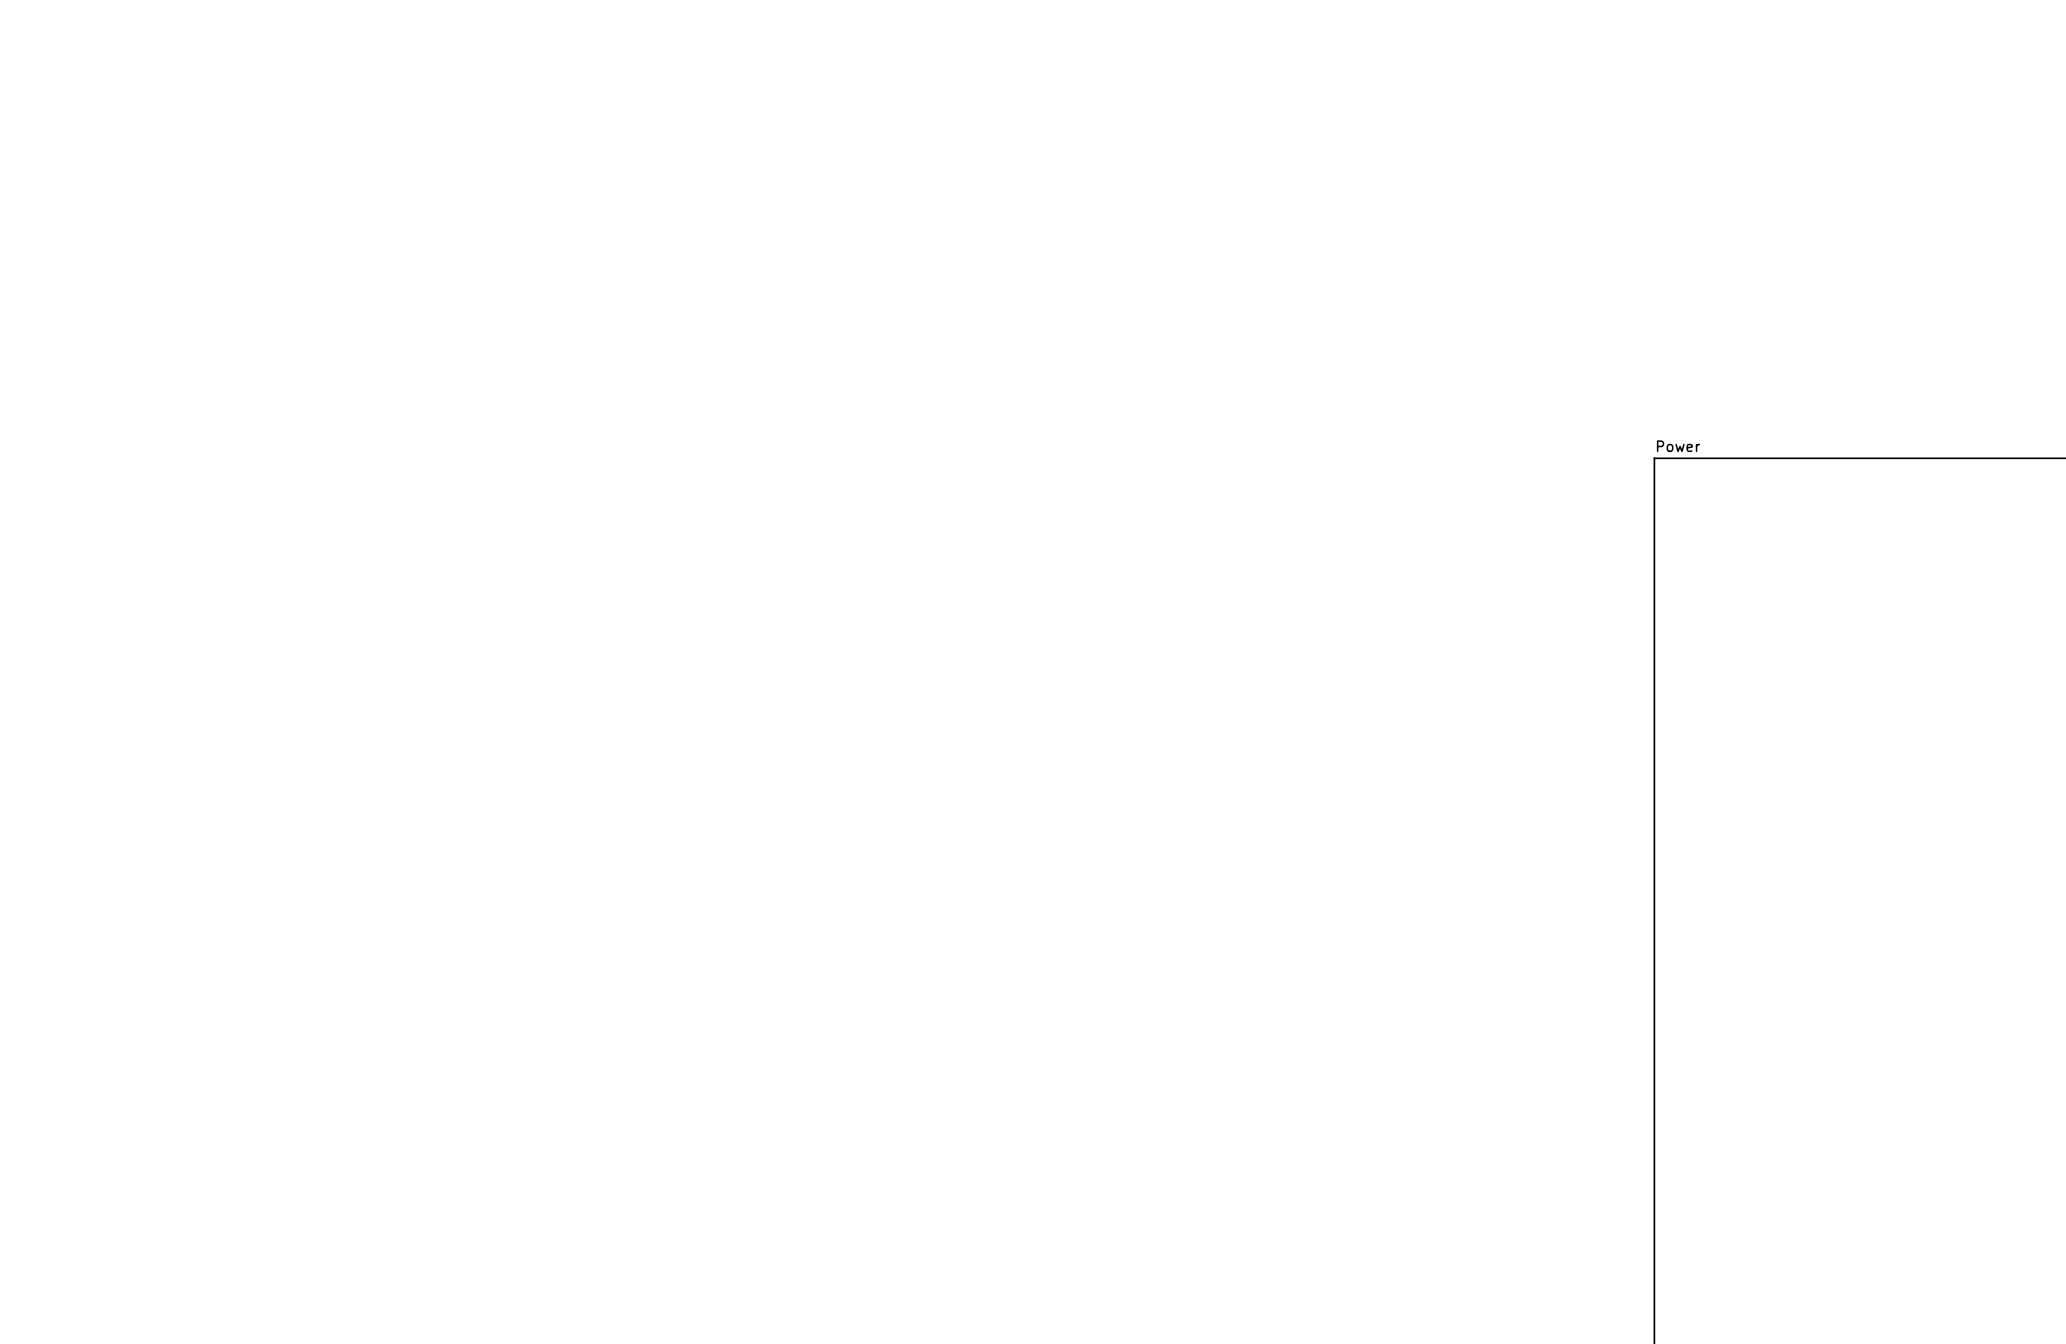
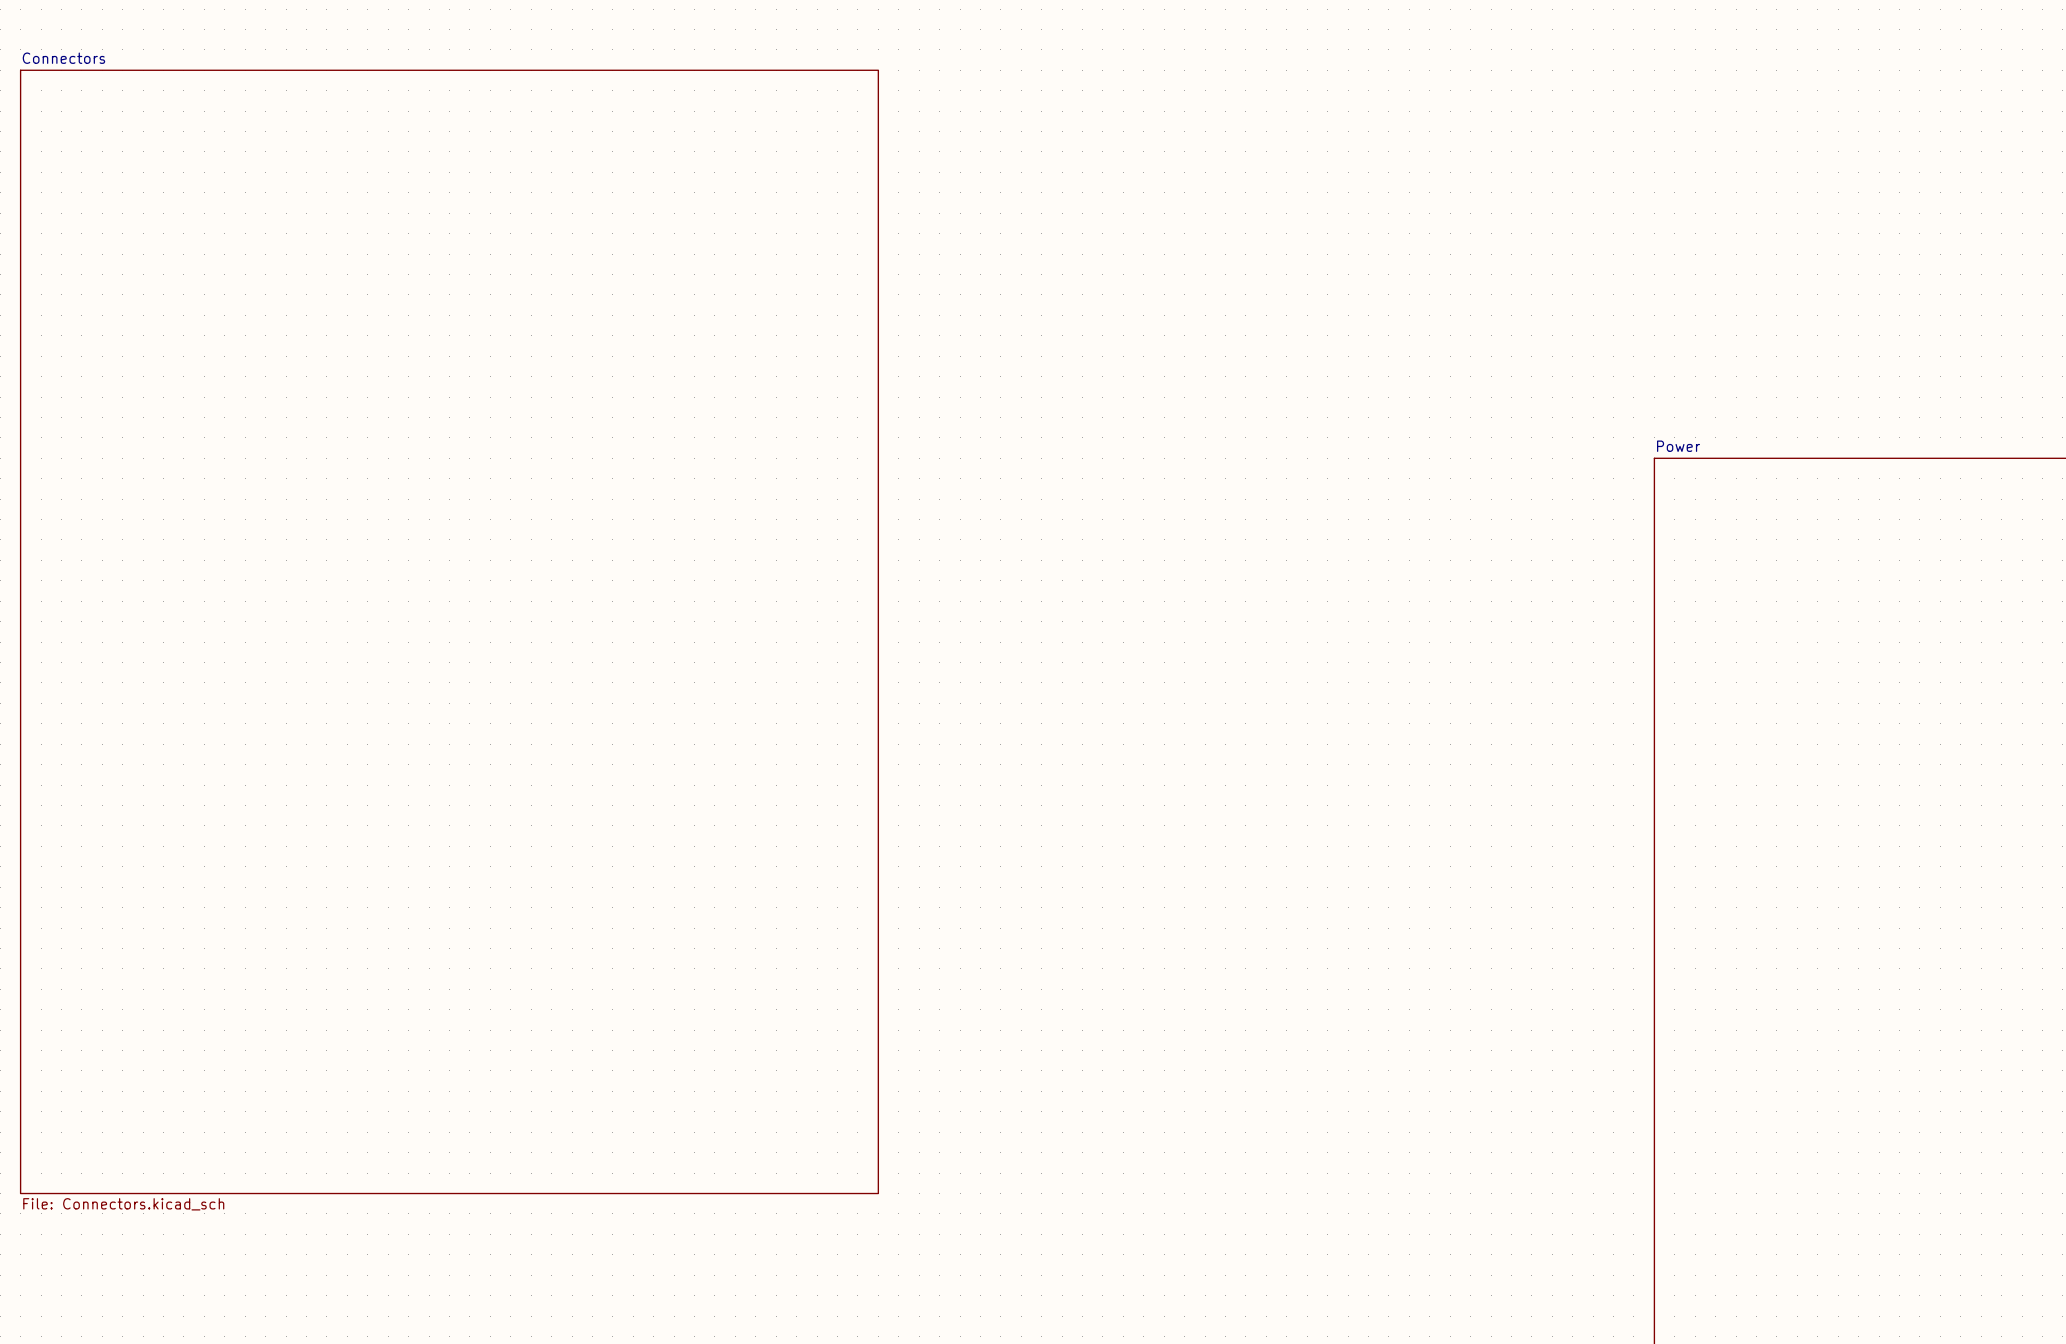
sheet Connectors: none -> File: Connectors.kicad_sch (449, 631)

